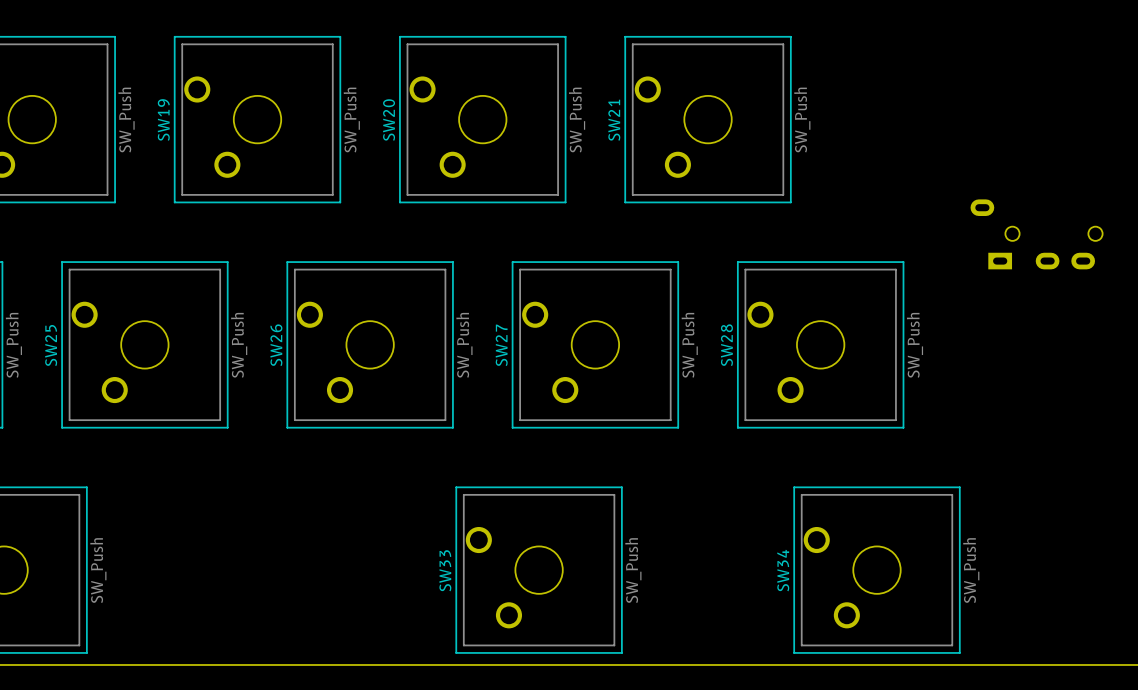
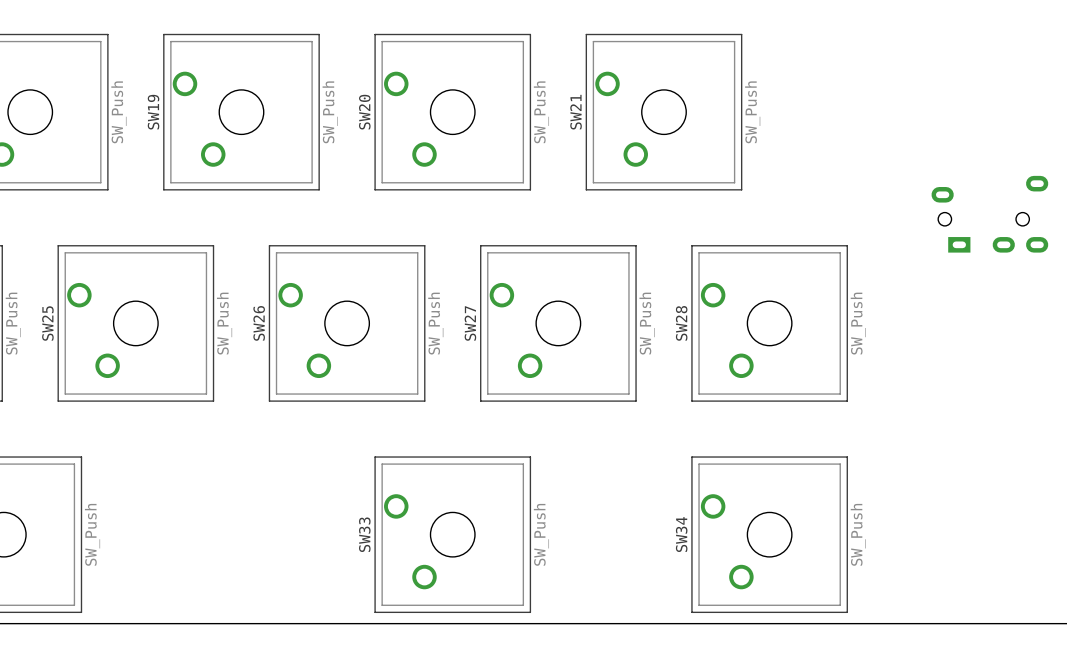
part: none -> (989, 214)
part: (1036, 234) -> none
SW33 position: (539, 570) -> (452, 534)
SW34 position: (876, 570) -> (769, 534)

